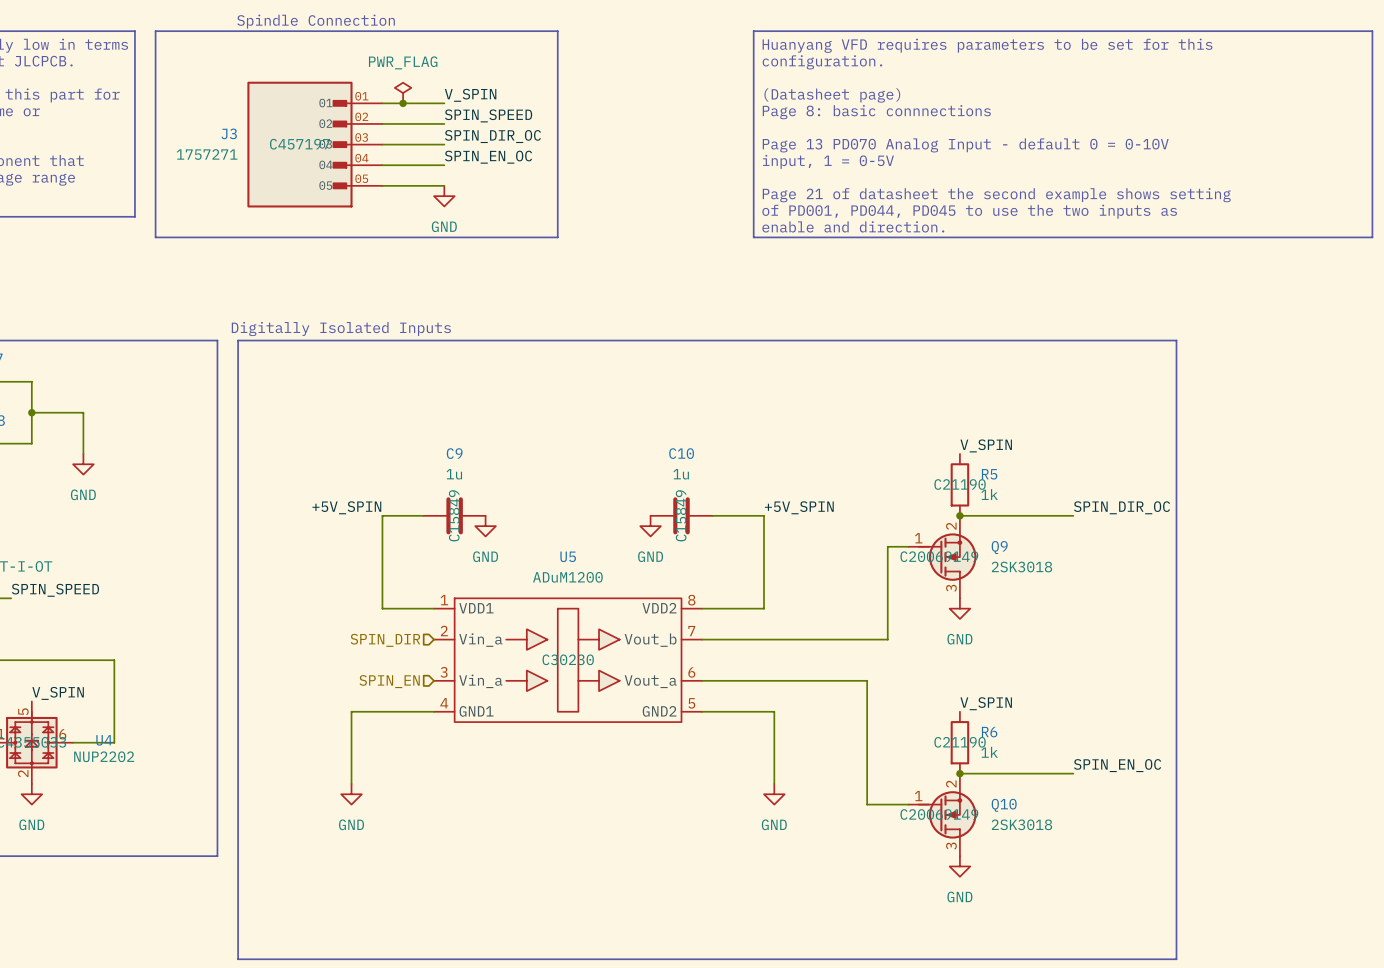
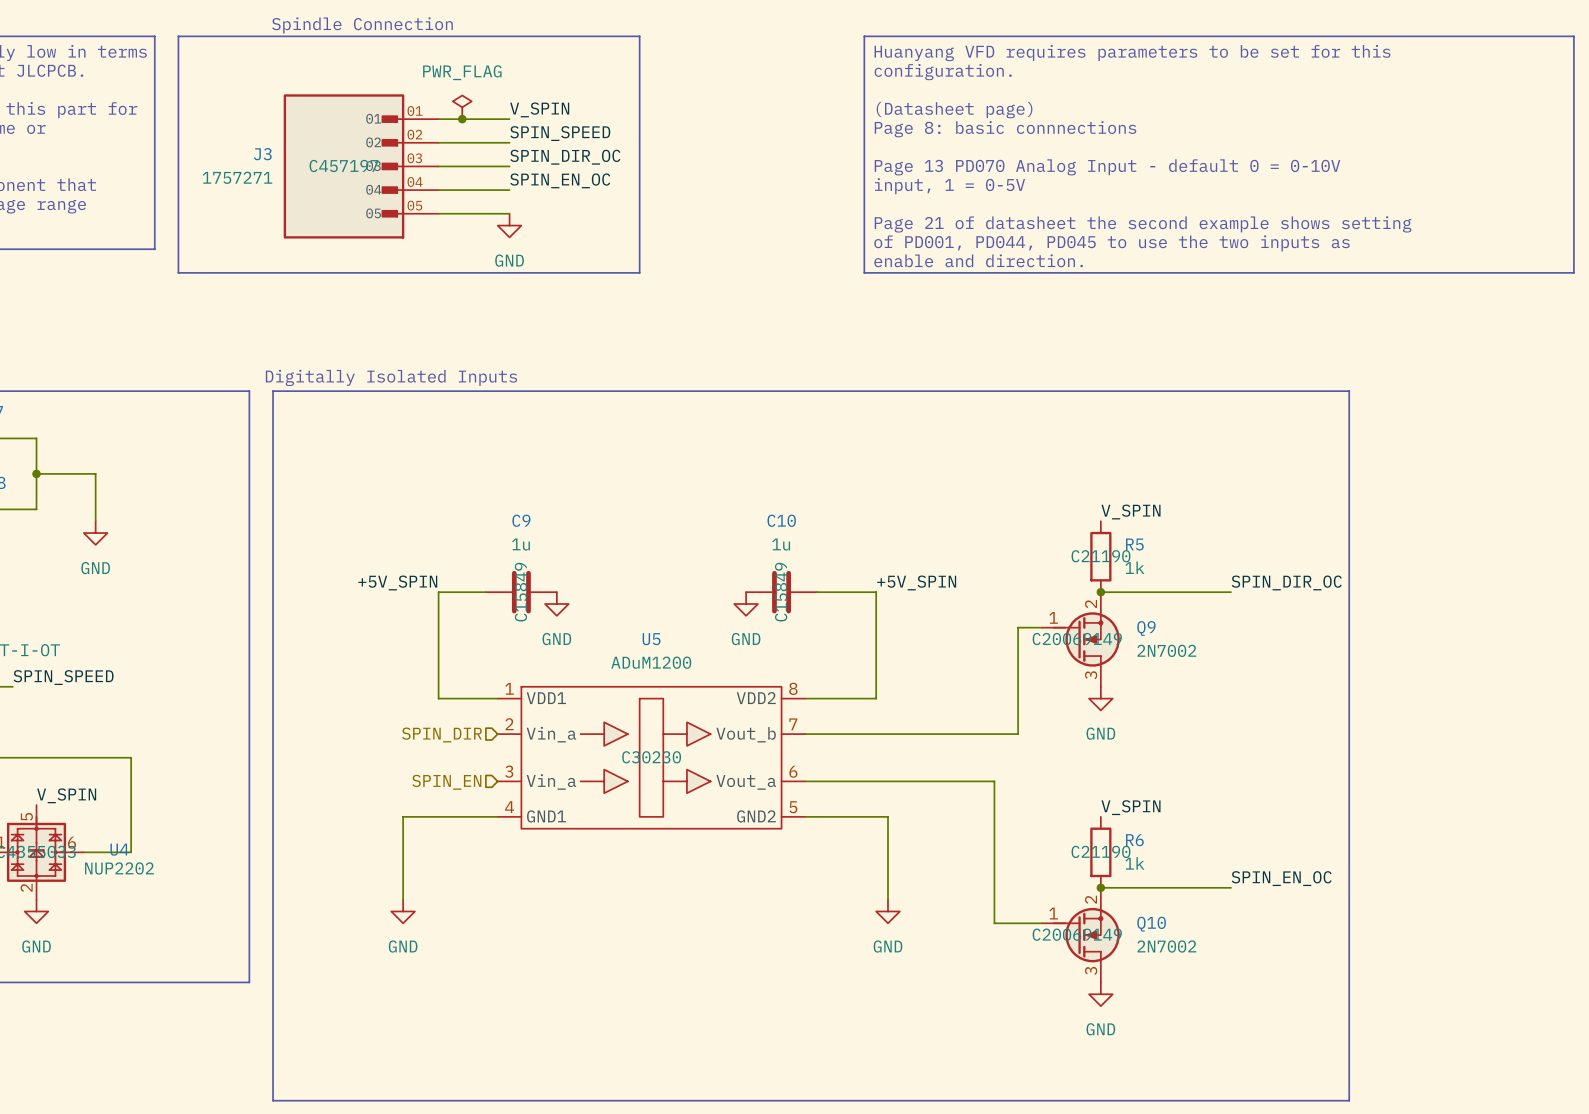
Q9 value: 2SK3018 (1021, 567) -> 2N7002 (1166, 650)
Q10 value: 2SK3018 (1021, 824) -> 2N7002 (1166, 946)

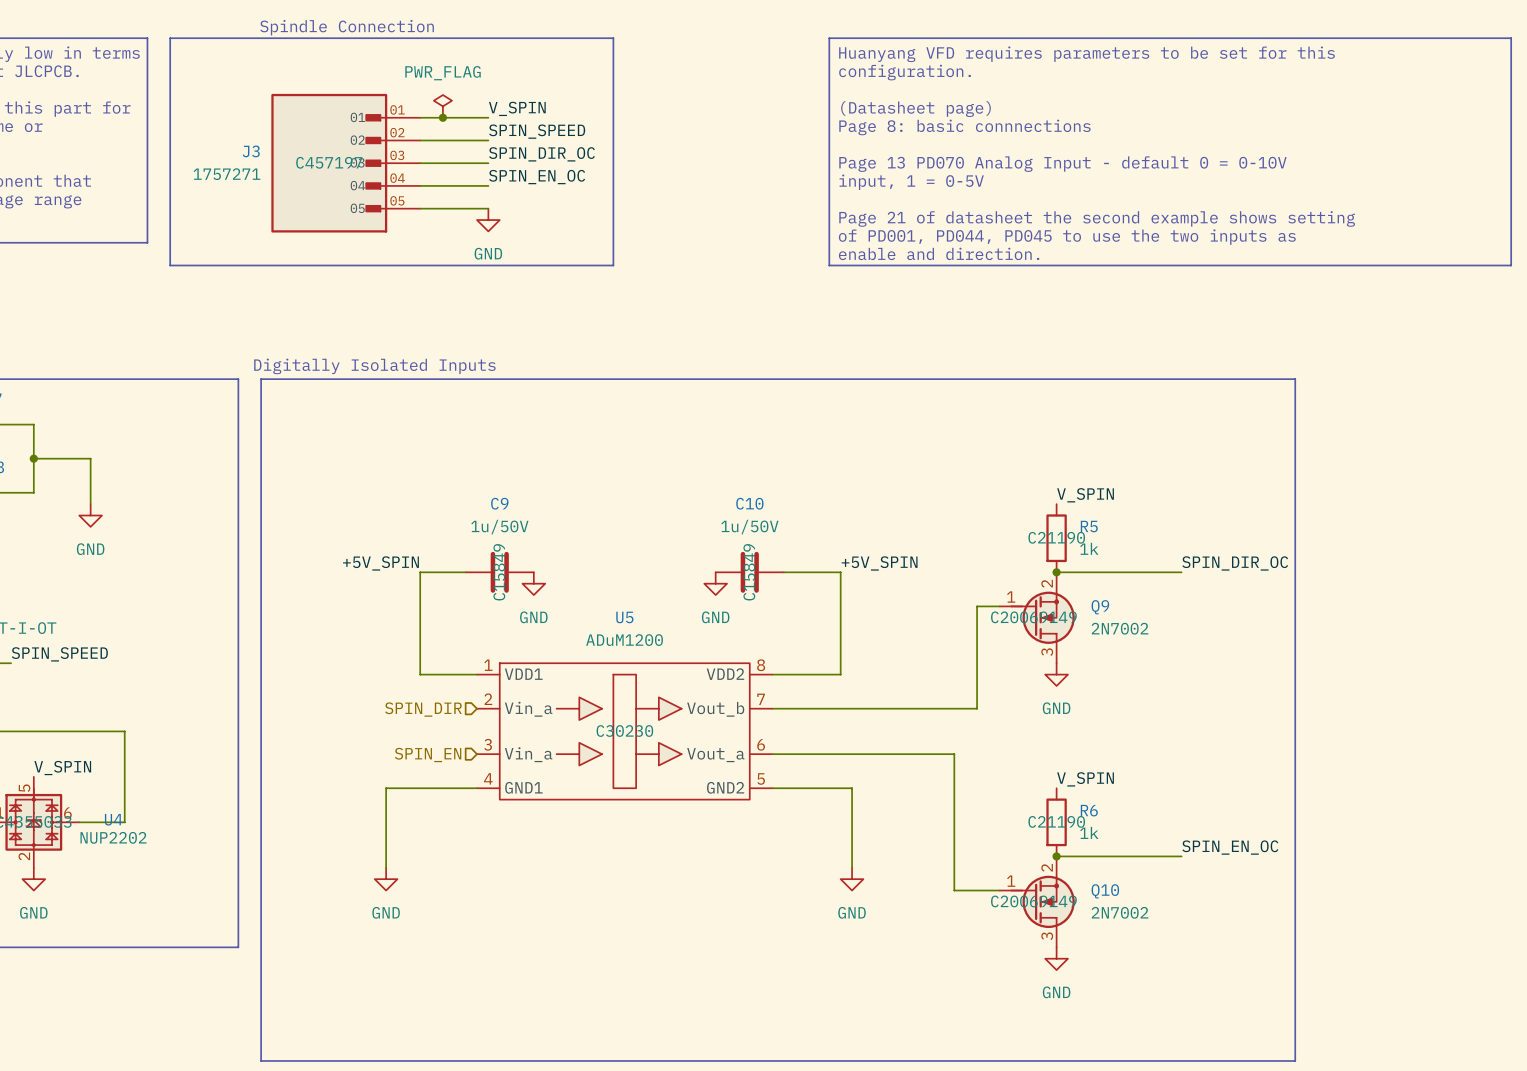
C9 value: 1u (521, 544) -> 1u/50V (499, 527)
C10 value: 1u (781, 544) -> 1u/50V (749, 527)

